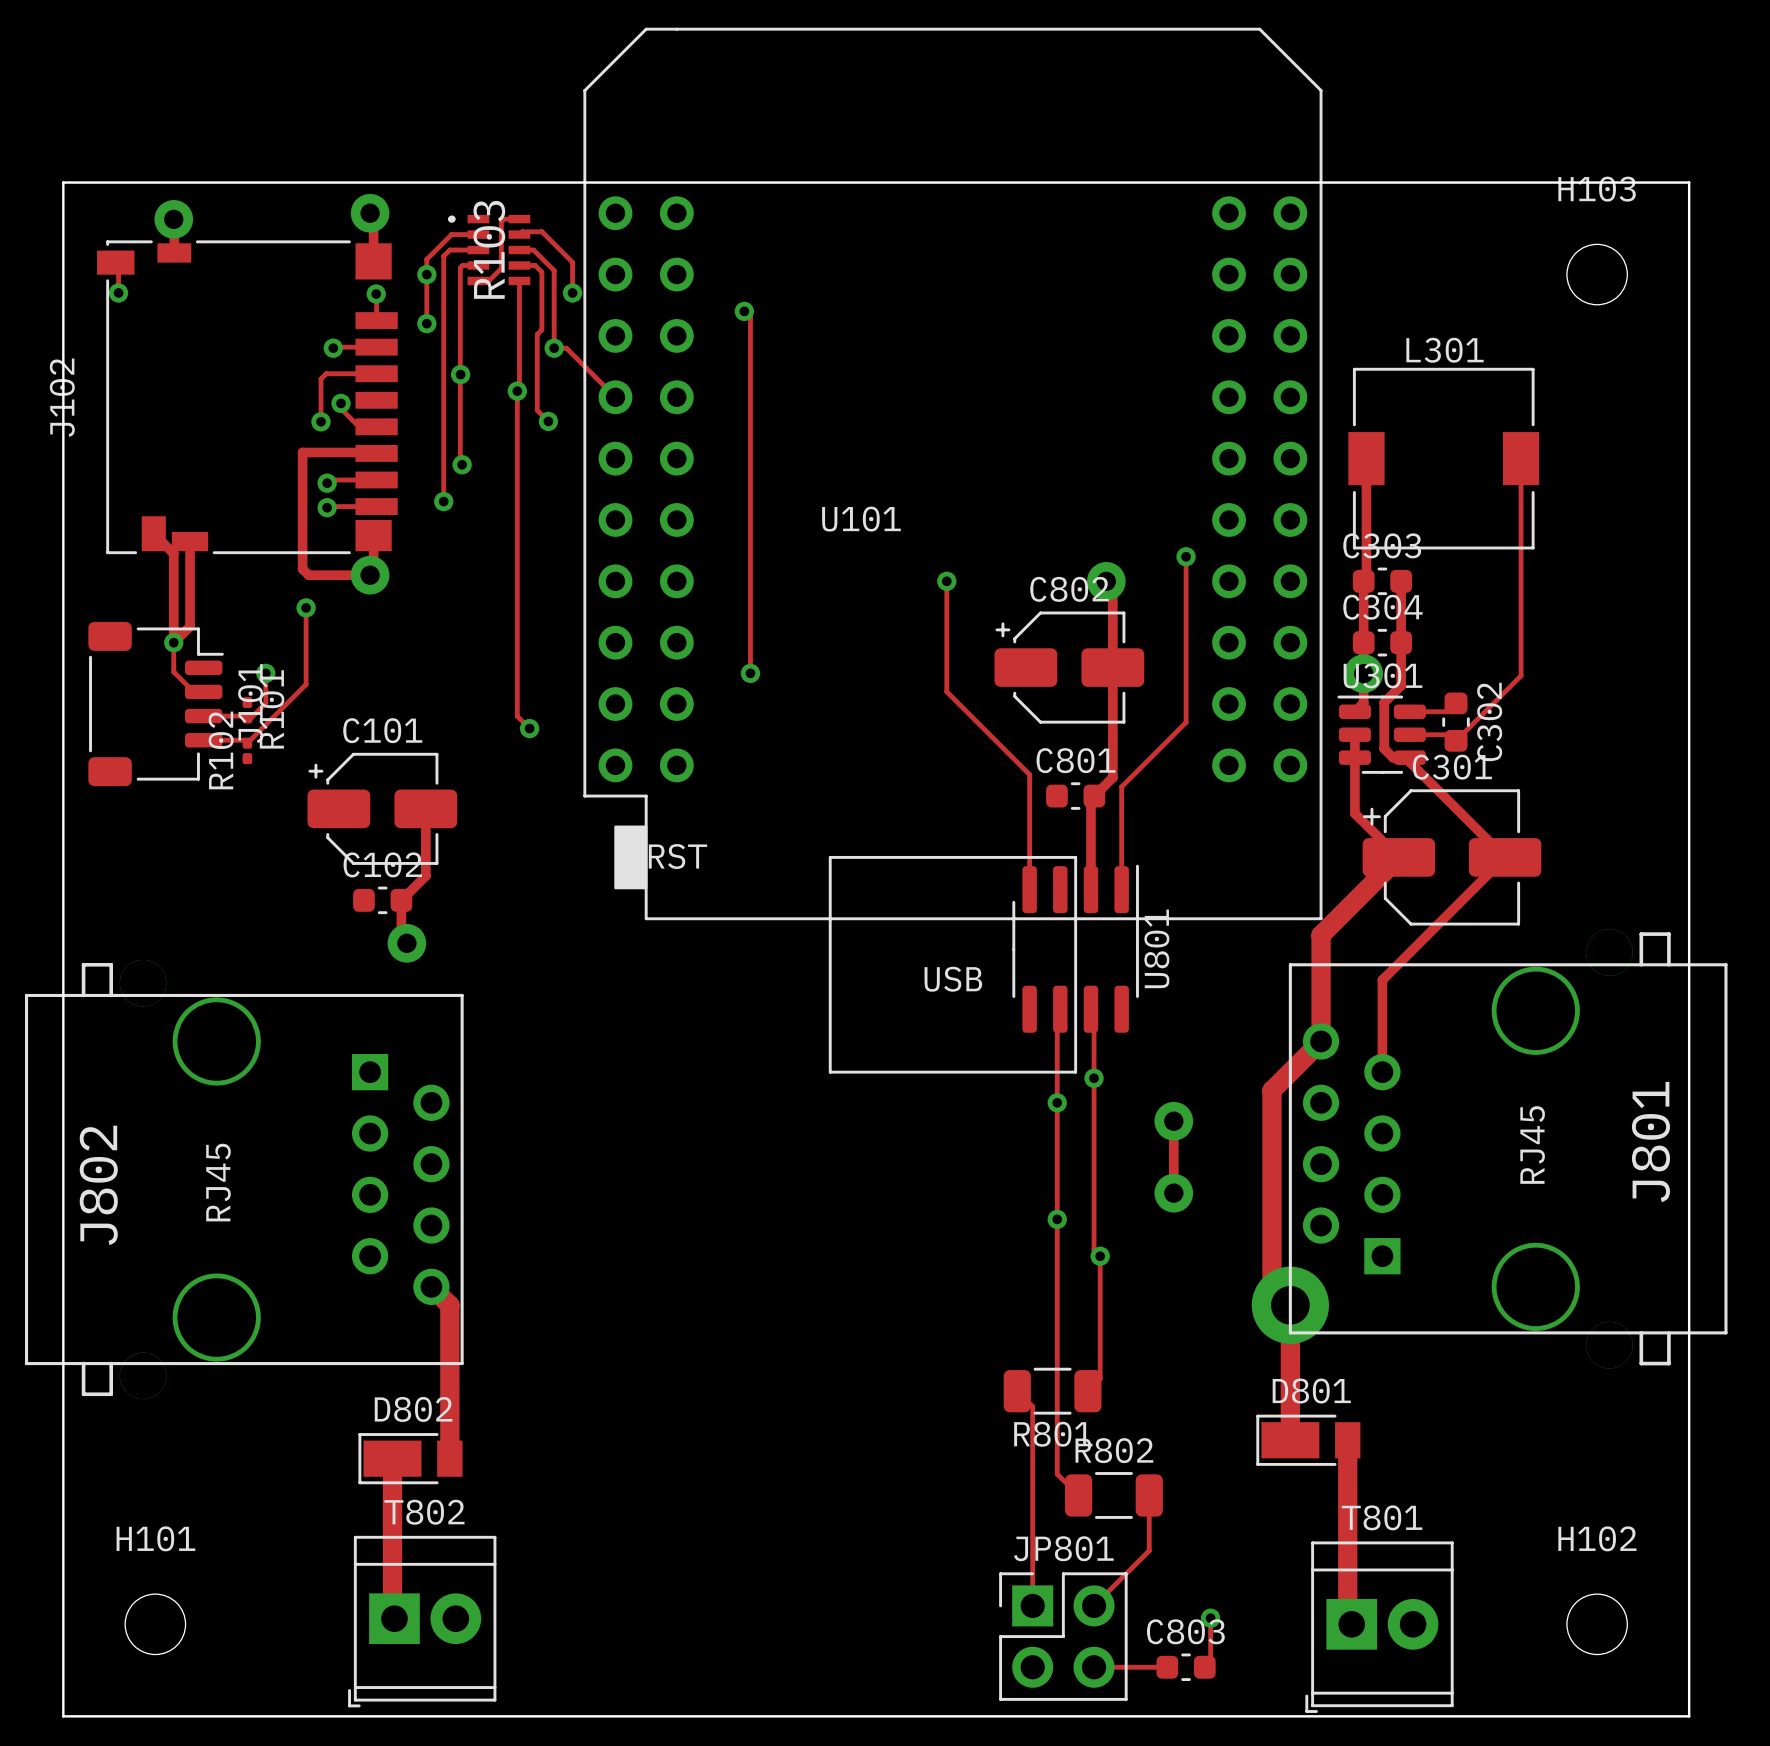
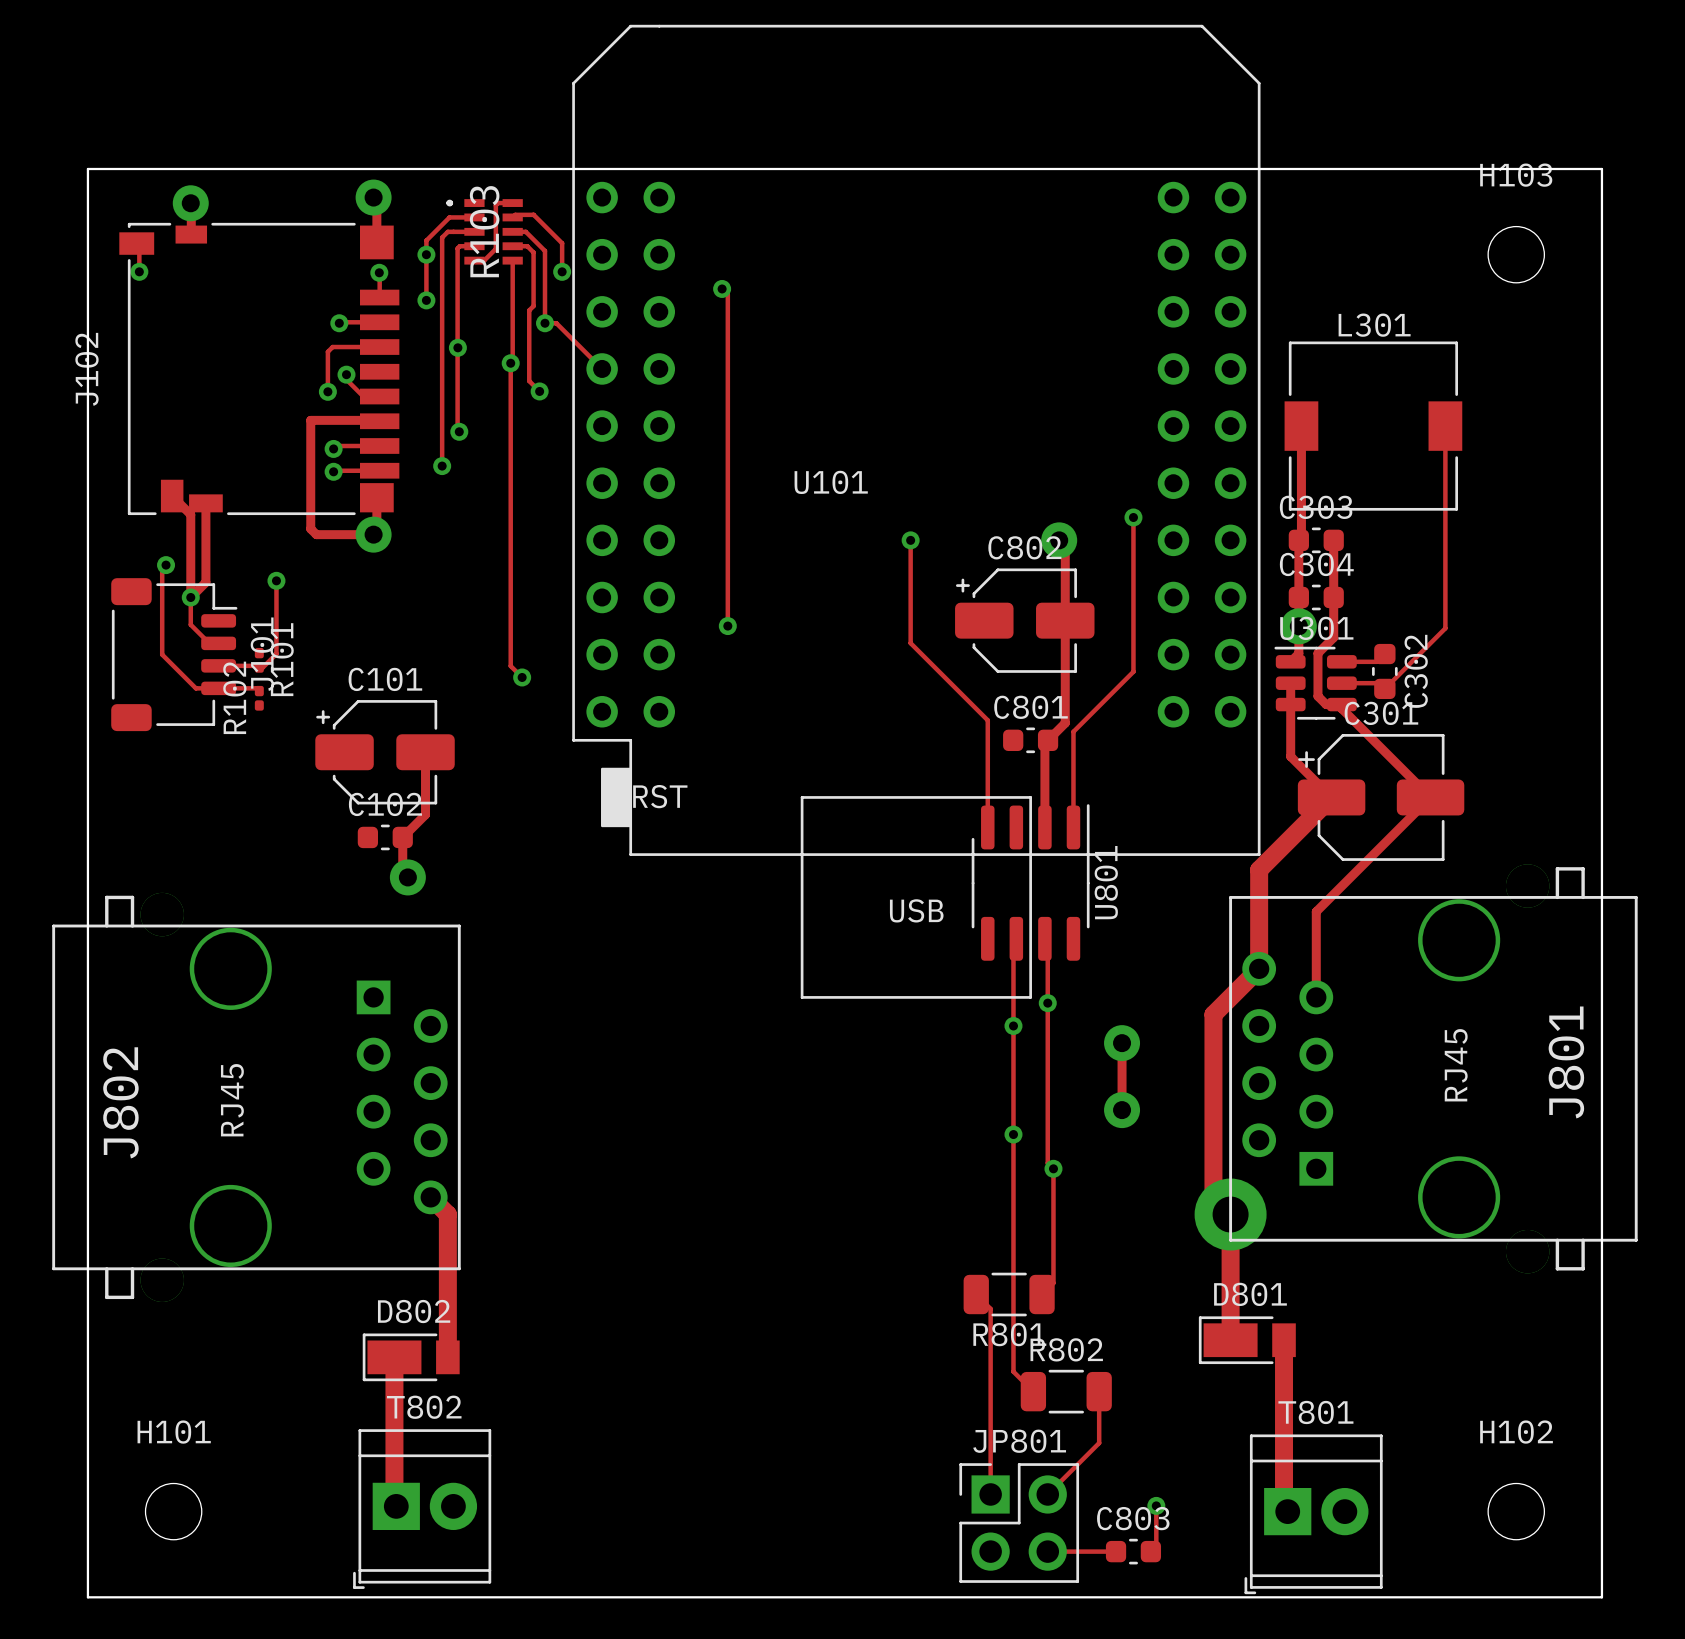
track: none -> (166, 565) (162, 568) (162, 654) (195, 688) (218, 688)
via: none -> (166, 565)
track: (306, 607) (306, 684) (247, 743) -> none
via: (306, 607) -> none
track: none -> (276, 580) (276, 626)
via: none -> (276, 580)
via: (265, 673) -> none

